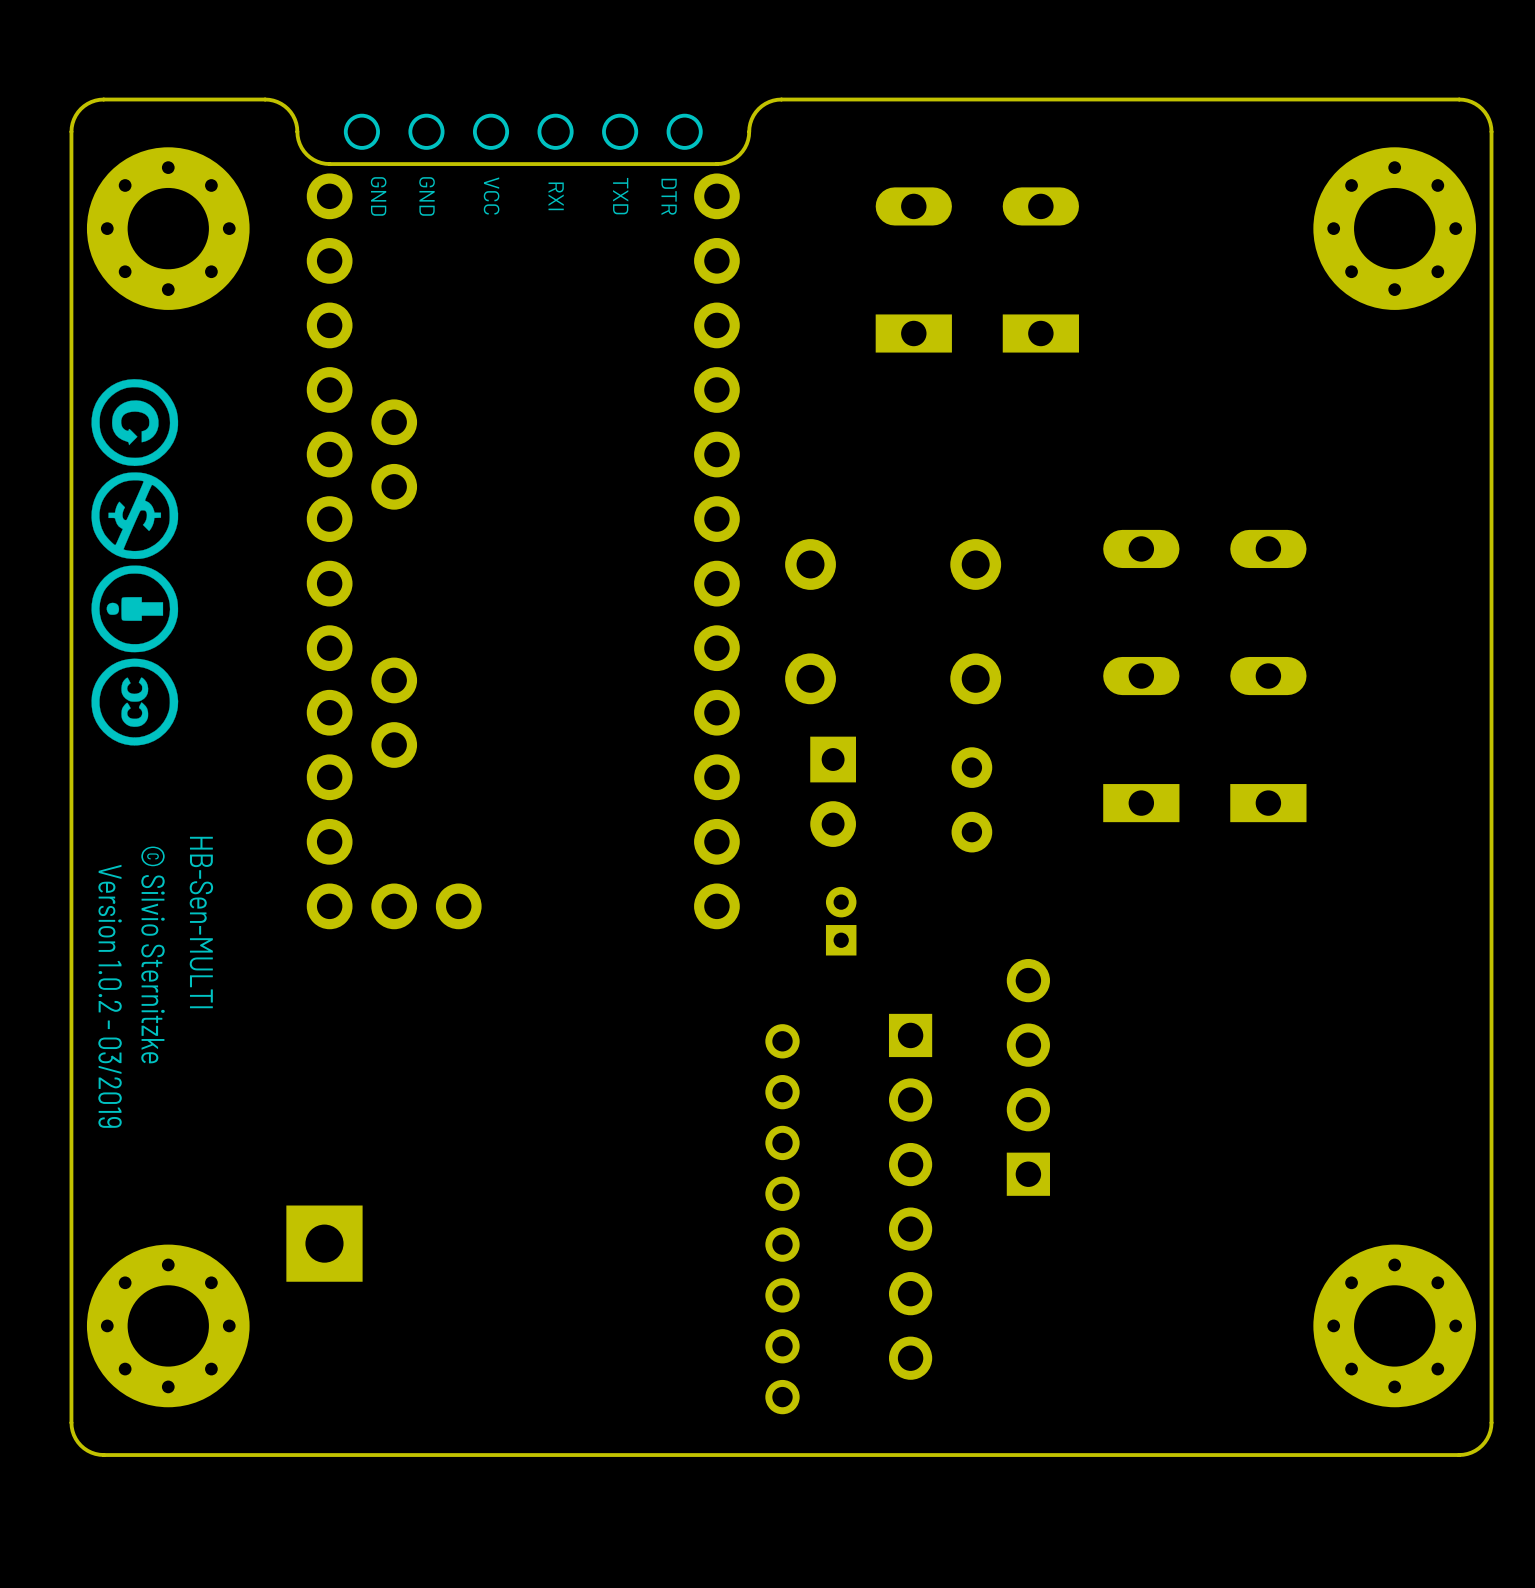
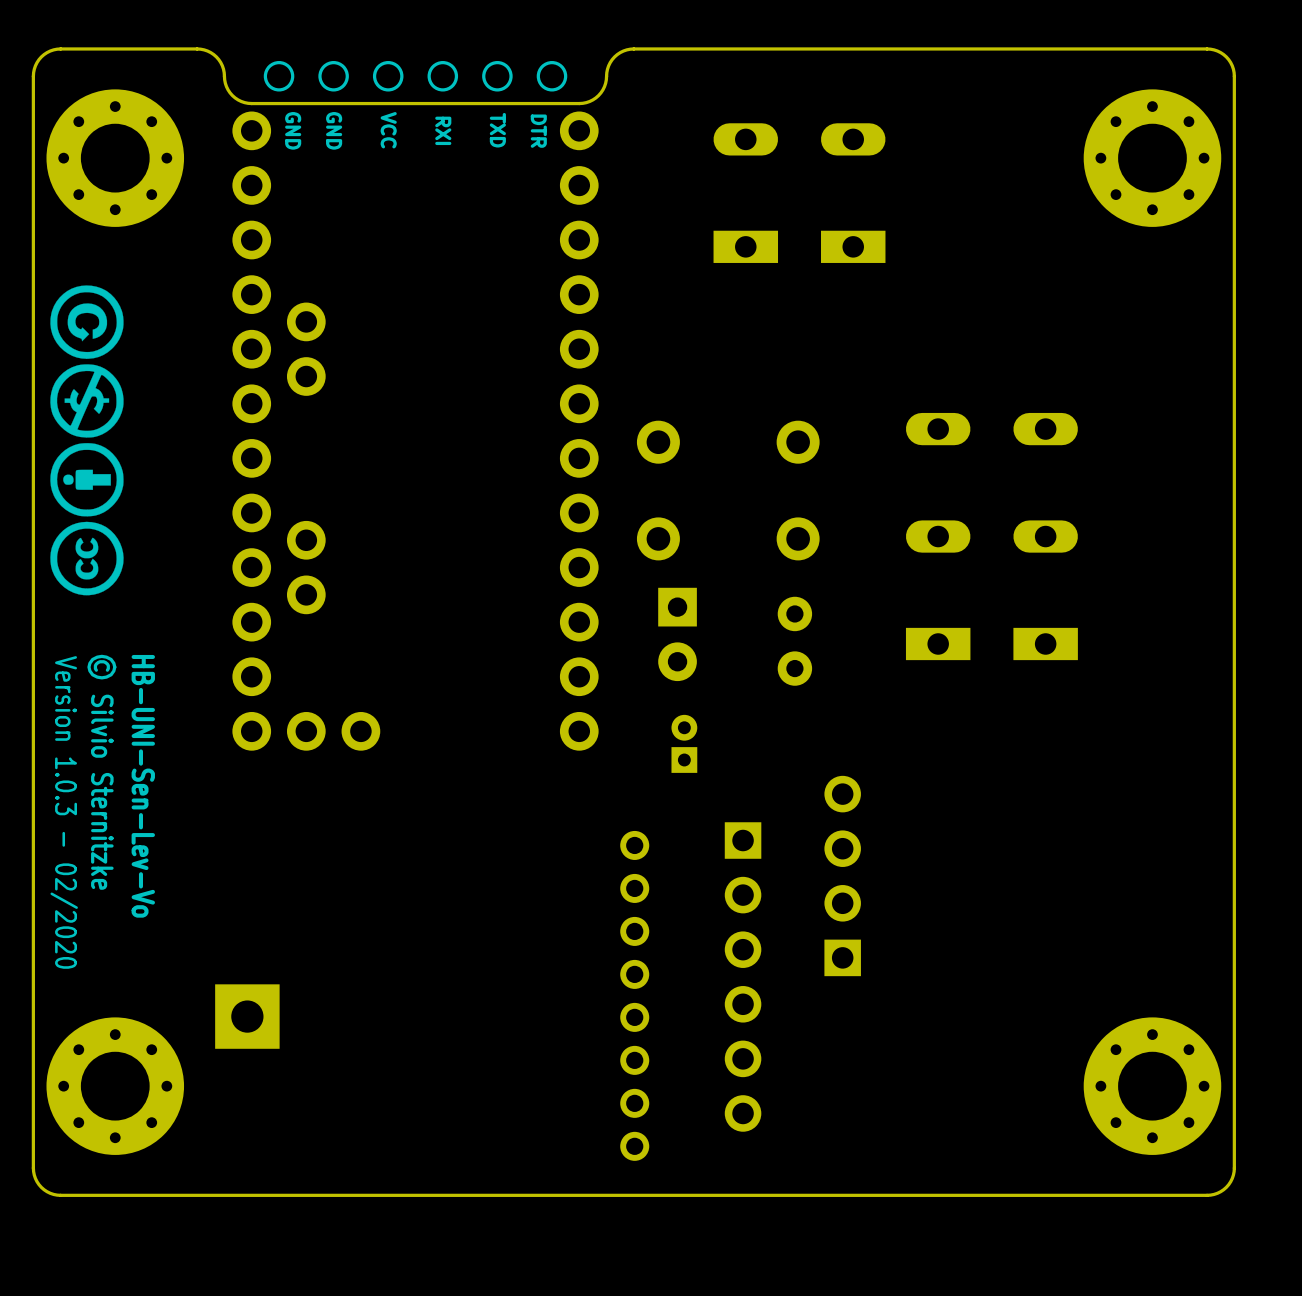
drawing shape: [98, 846, 165, 1128] -> [50, 654, 117, 969]
text: HB-Sen-MULTI (201, 922) -> none
text: none -> HB-UNI-Sen-Lev-Vo (143, 786)

